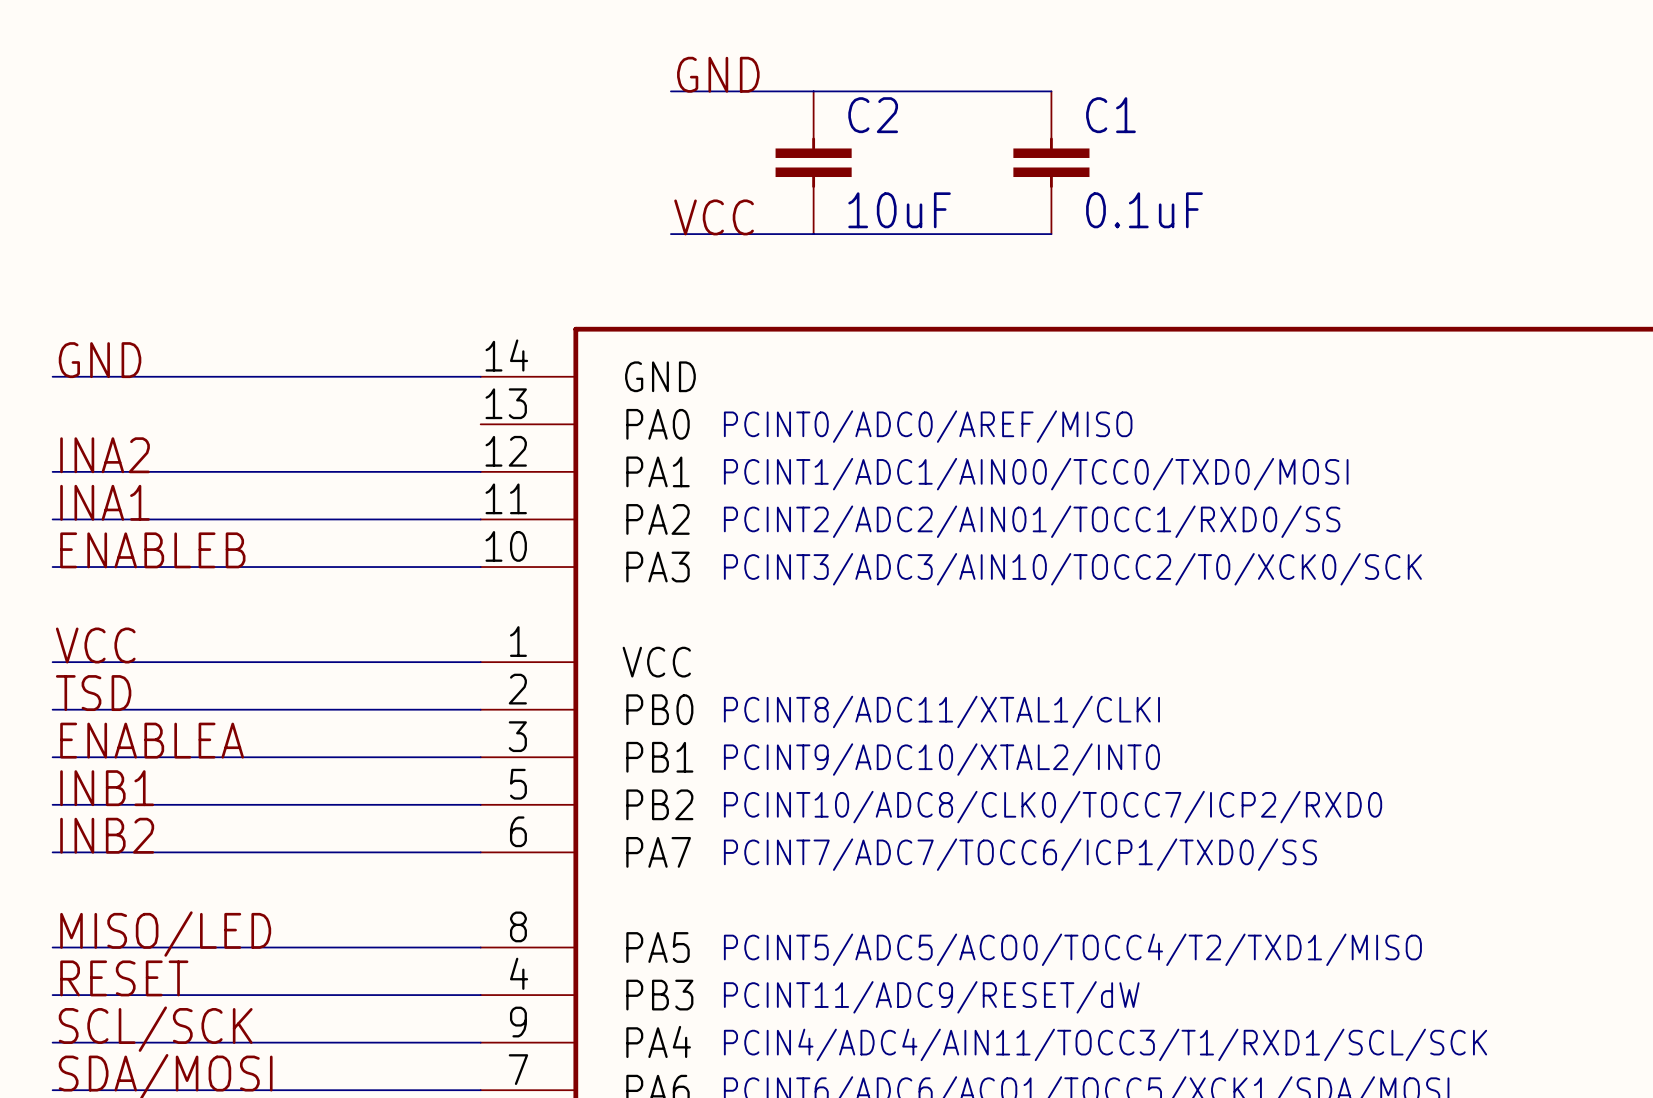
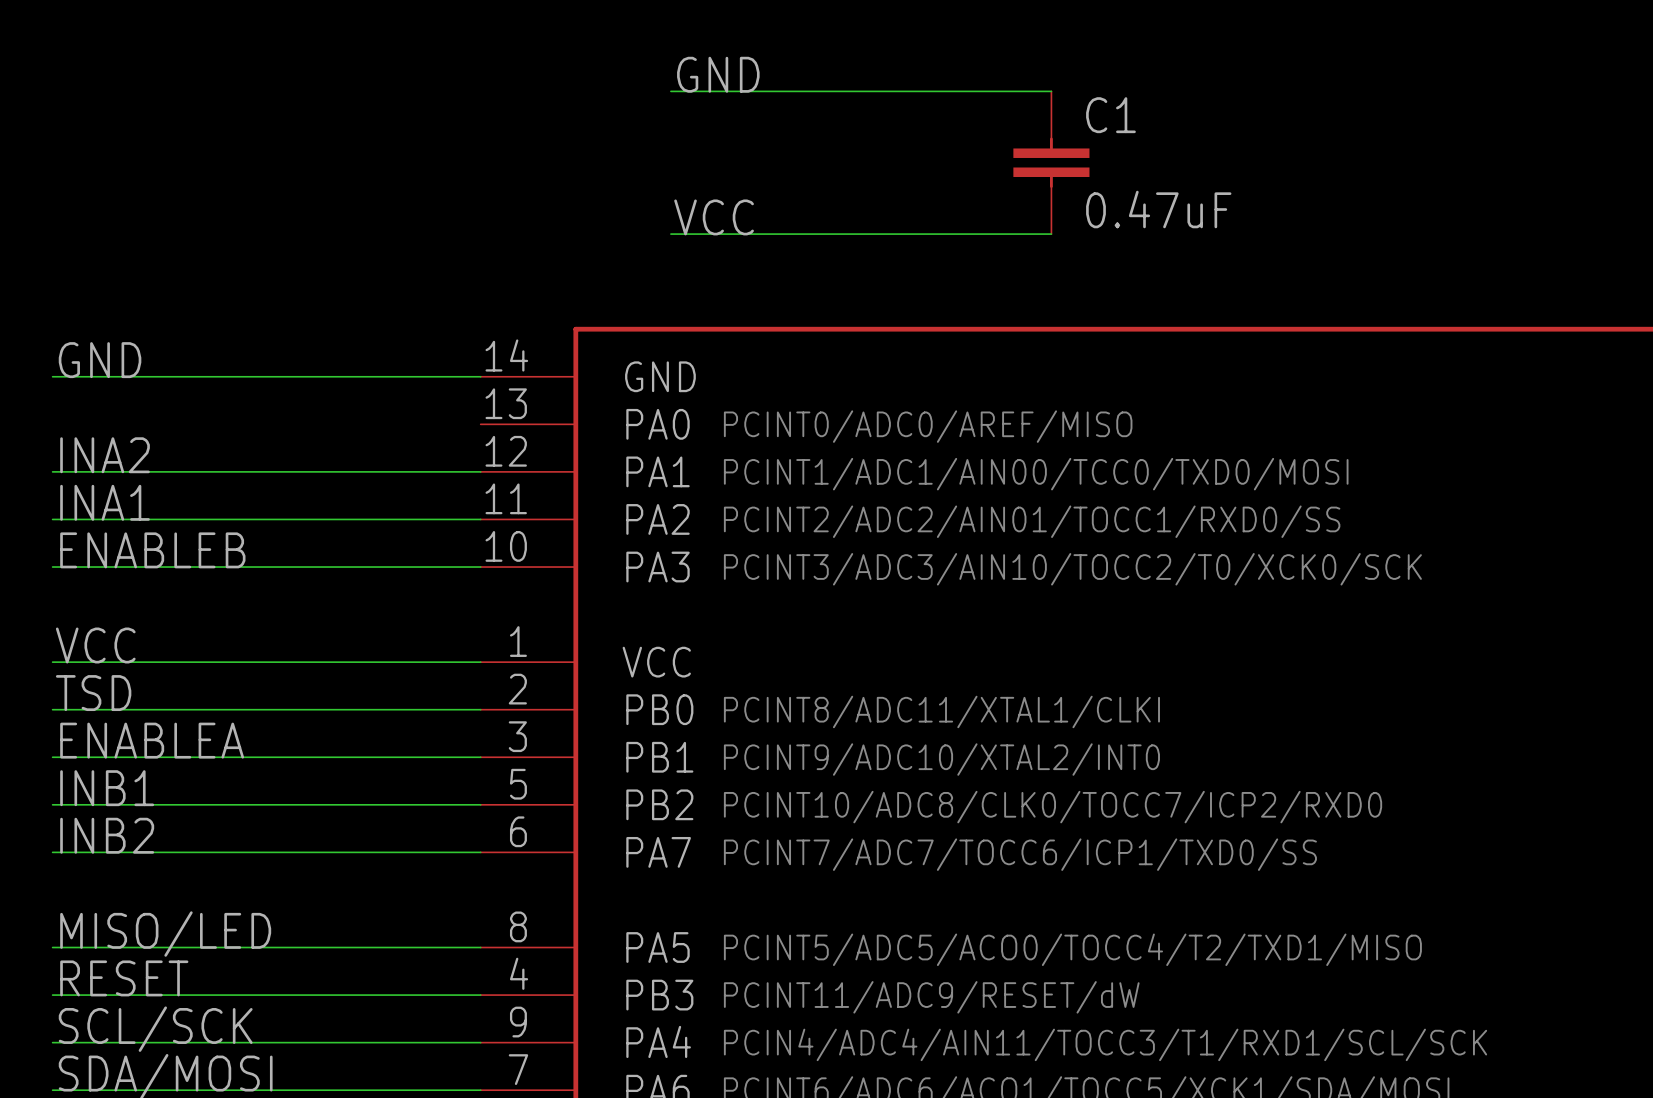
C2: 10uF (813, 162) -> none
C1 value: 0.1uF (1144, 210) -> 0.47uF (1158, 209)

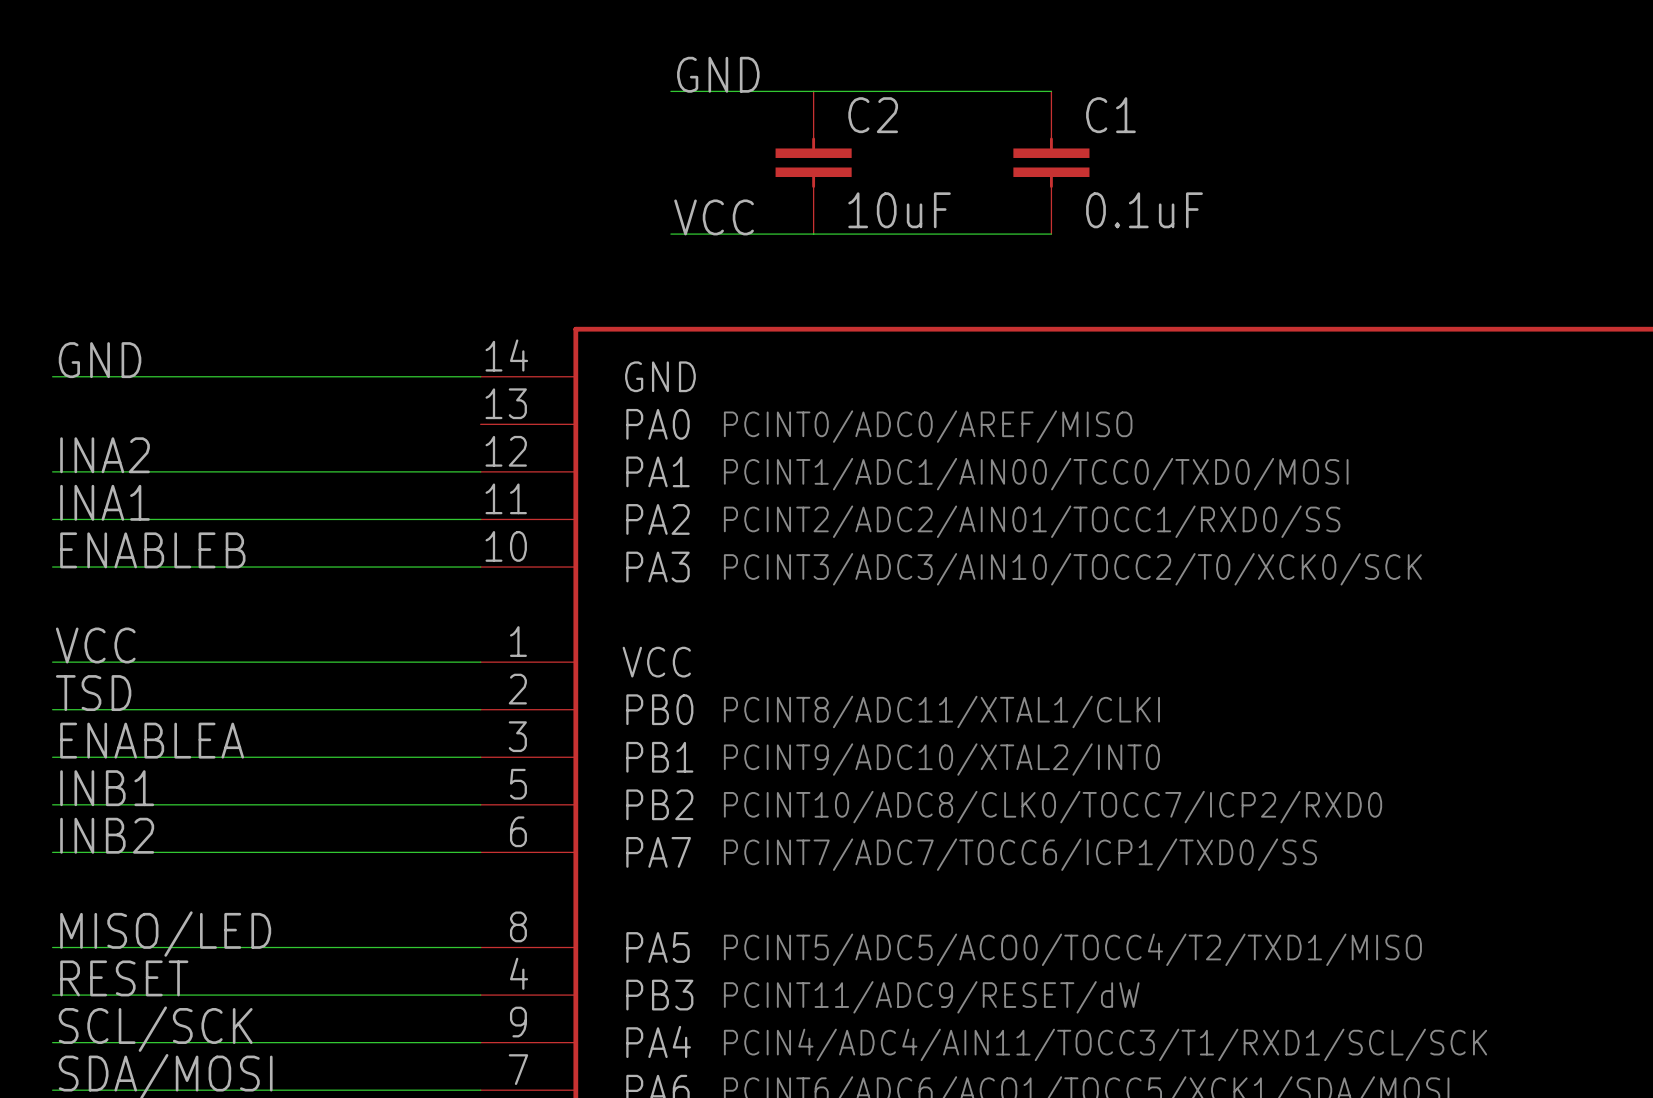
C2: none -> 10uF (813, 162)
C1 value: 0.47uF (1158, 209) -> 0.1uF (1144, 210)

